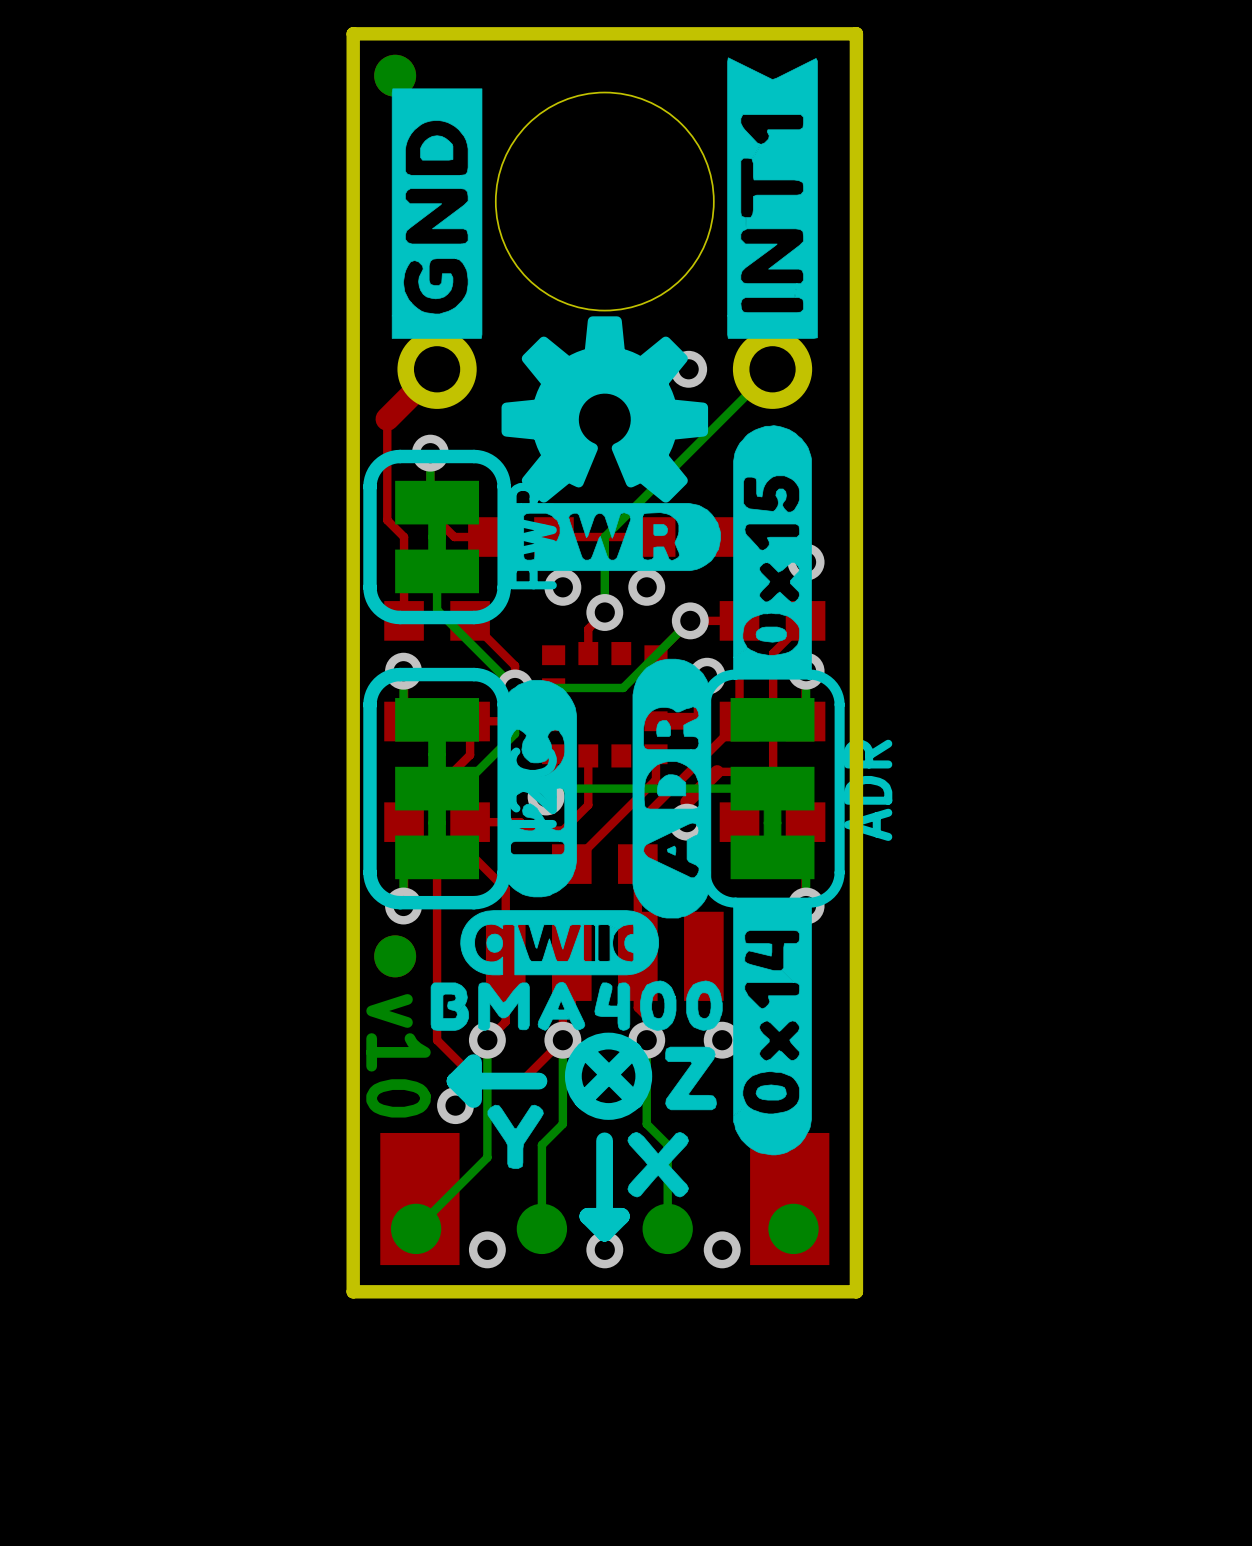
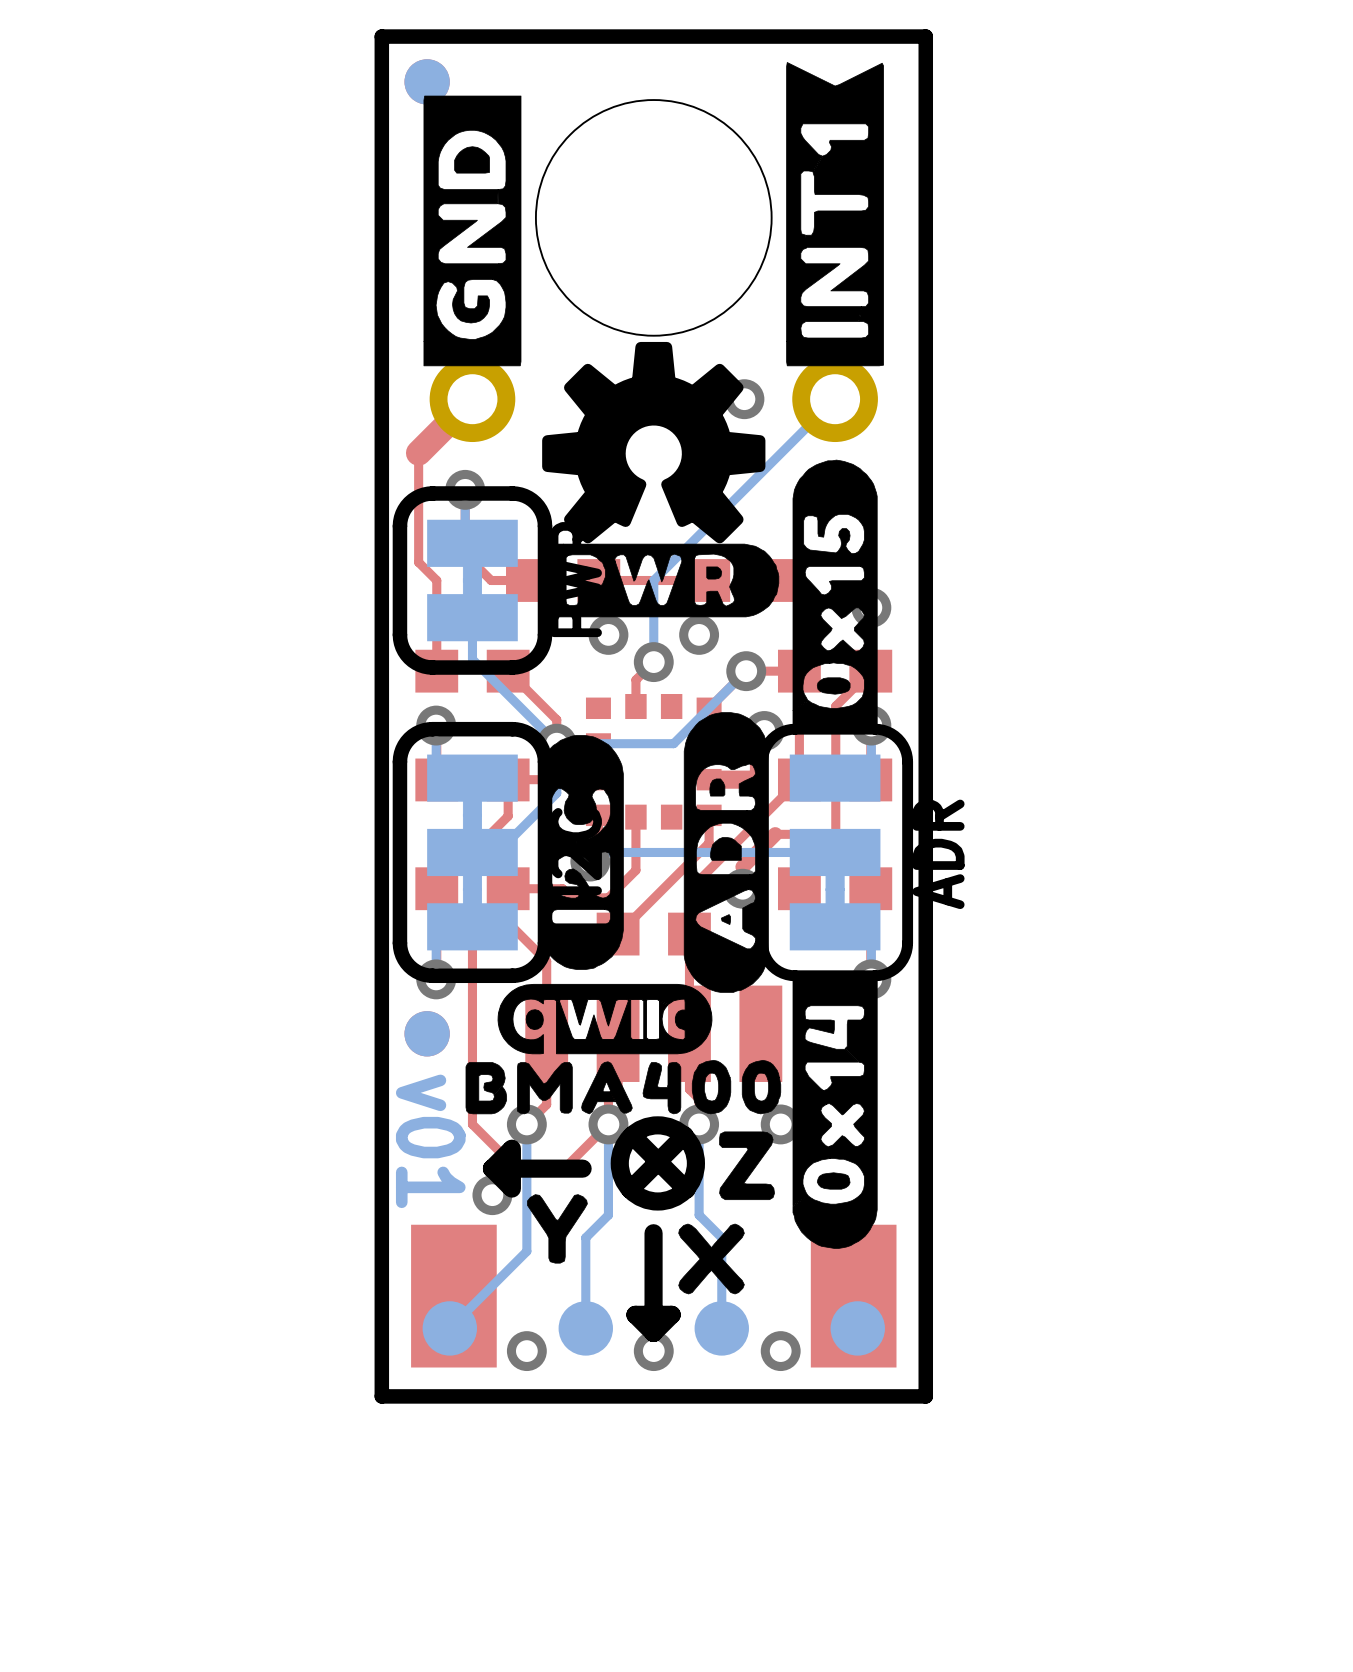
text: v10 (398, 1055) -> v01 (430, 1141)

